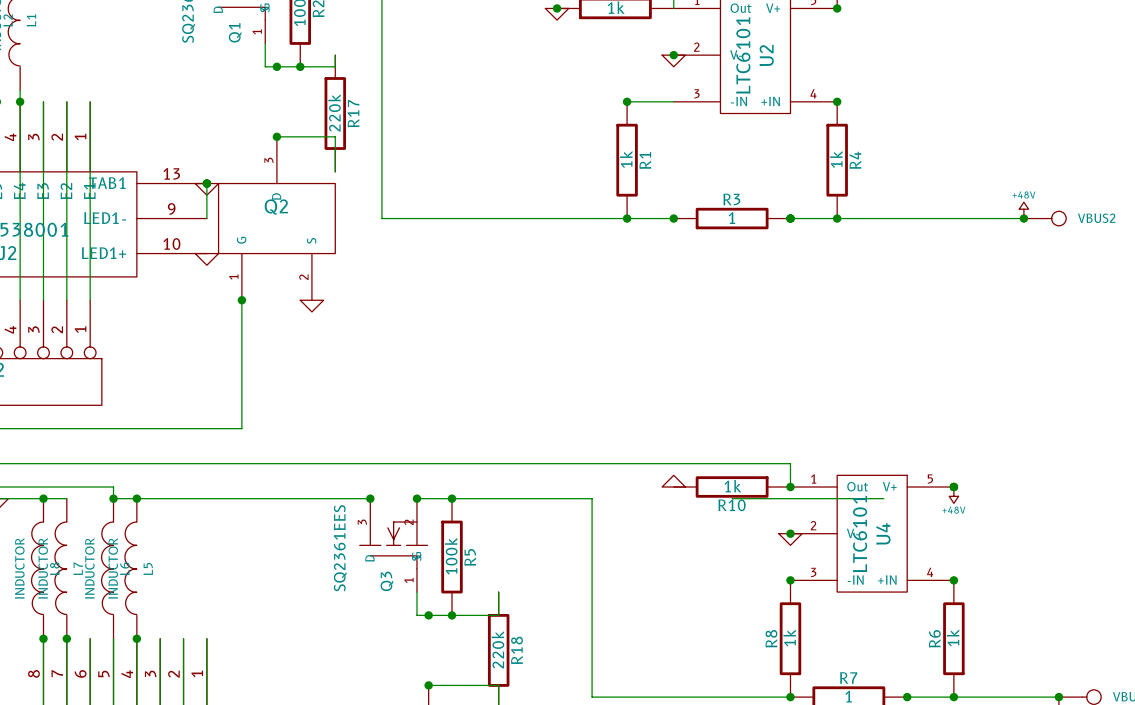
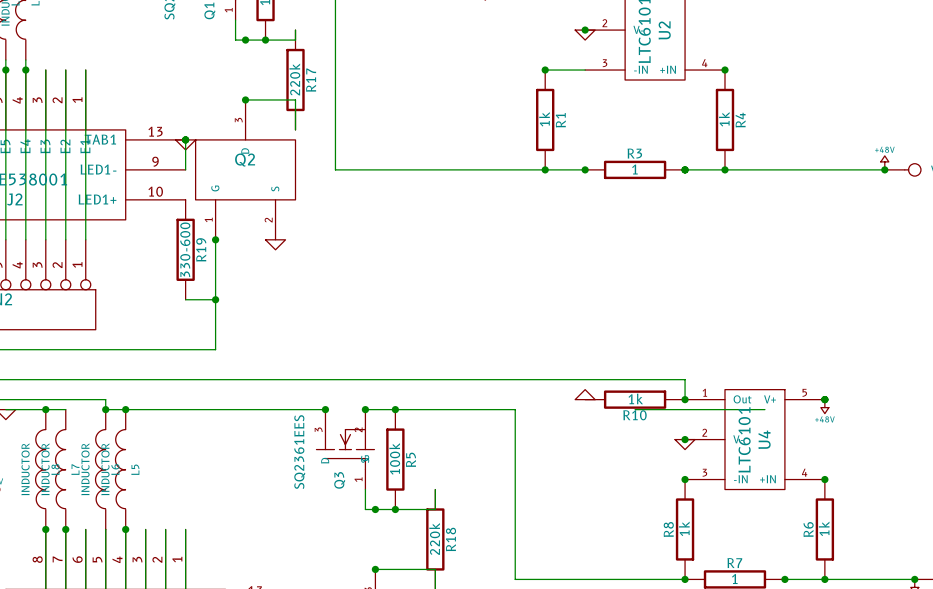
power symbol: (206, 259) -> none
R19: none -> 330-600 (185, 249)
wire: none -> (185, 299) (215, 299)
junction: none -> (215, 299)

